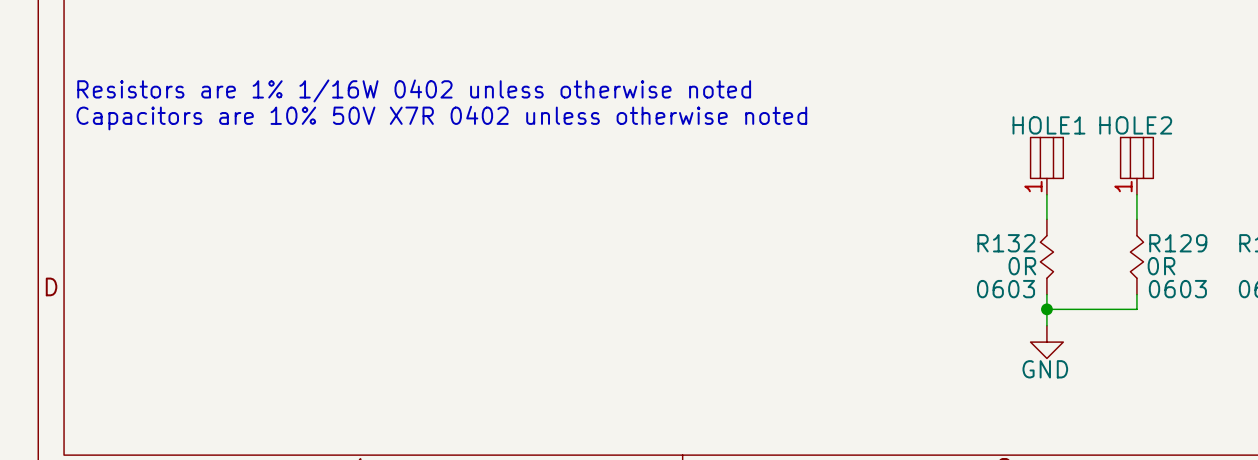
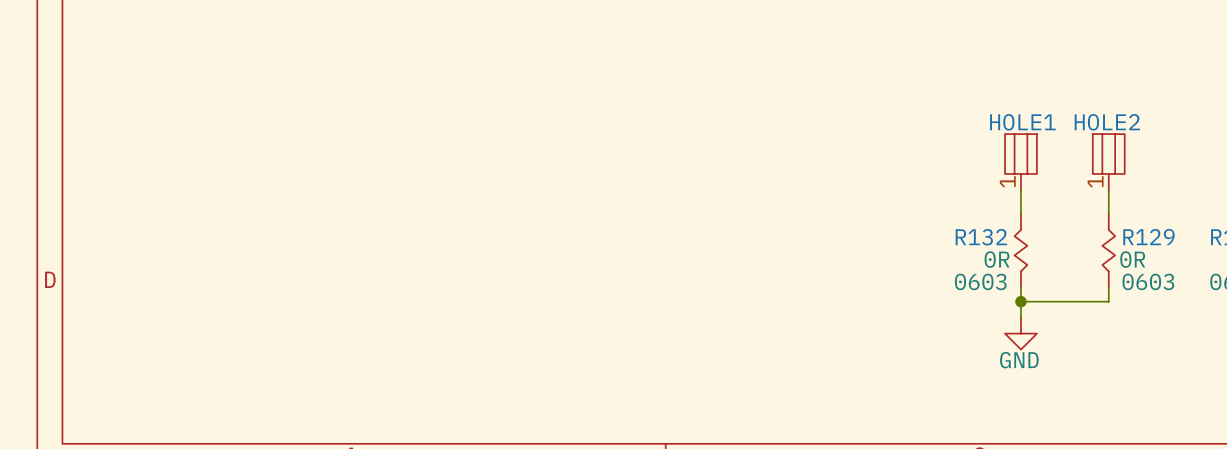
text: Resistors are 1% 1/16W 0402 unless otherwise noted (414, 90) -> none
text: Capacitors are 10% 50V X7R 0402 unless otherwise noted (441, 118) -> none

